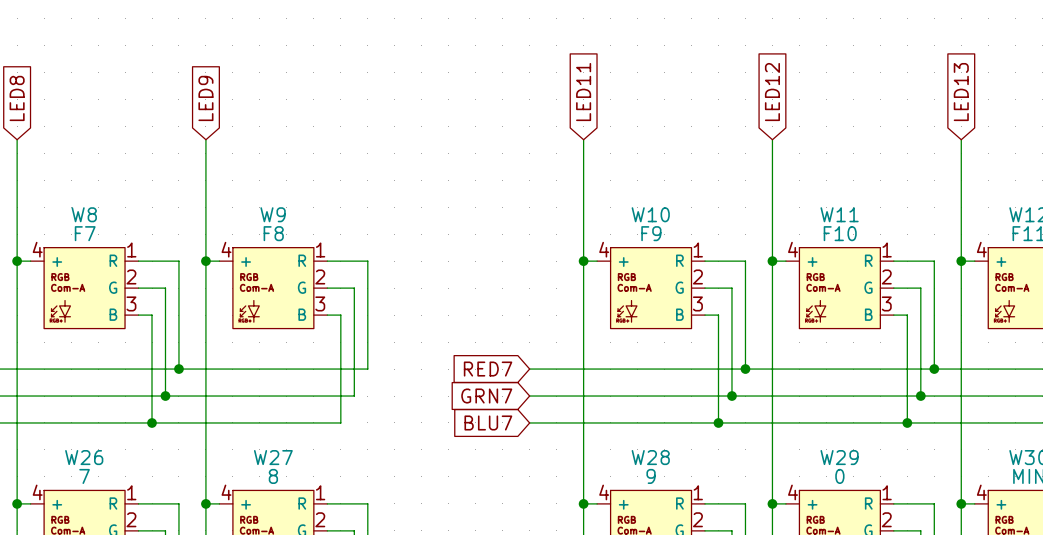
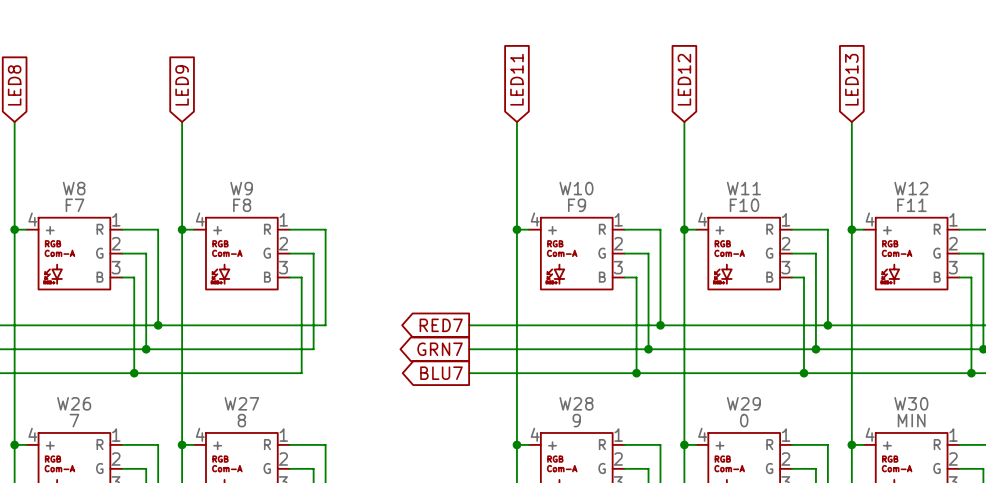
global label shape: input (488, 369) -> output (441, 325)
global label shape: input (486, 396) -> output (440, 349)
global label shape: input (488, 422) -> output (441, 373)

